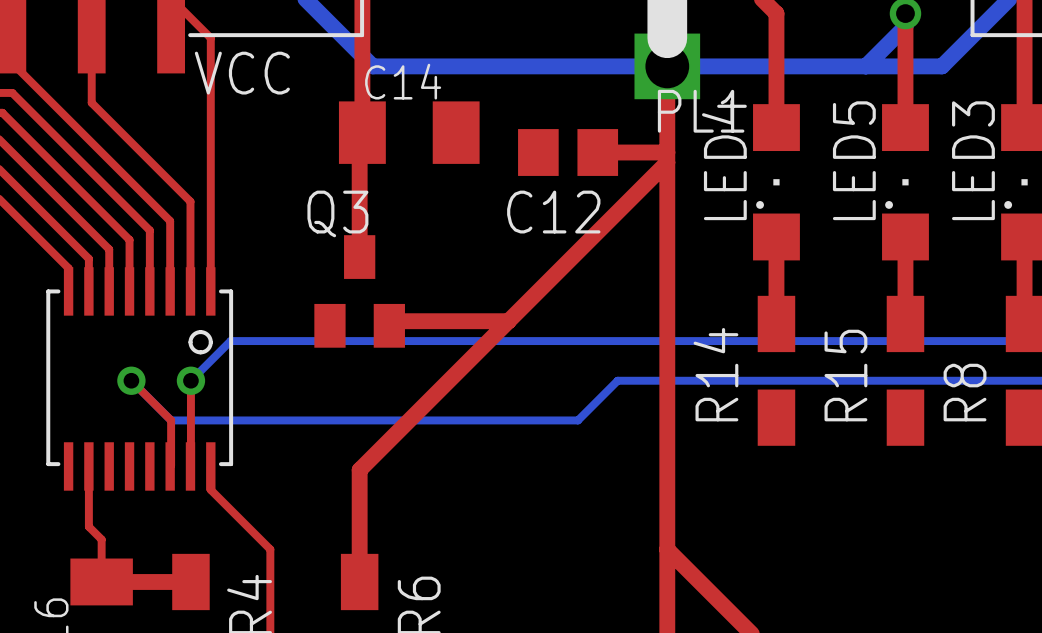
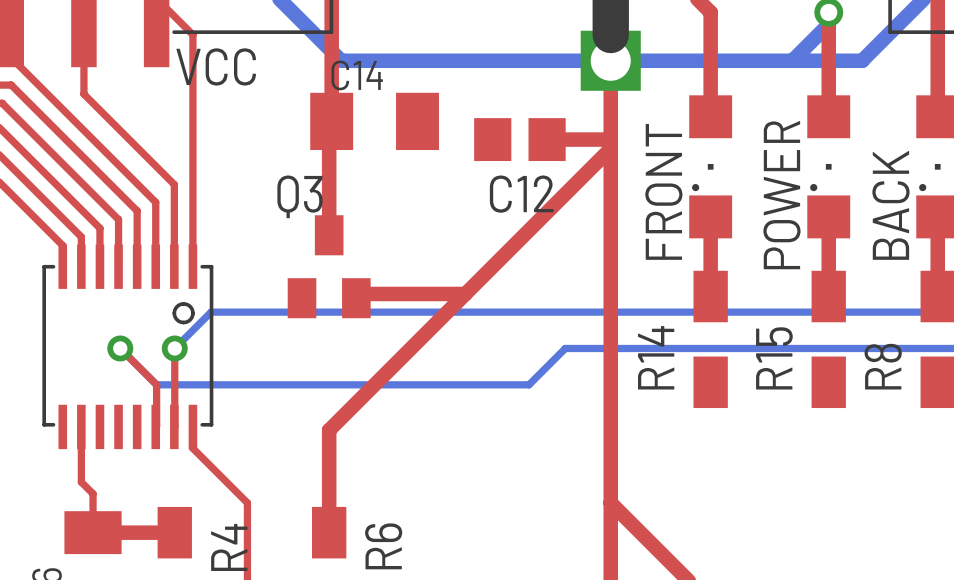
PL1 name: PL1 (701, 111) -> none
LED4 name: LED4 (724, 159) -> FRONT (663, 191)
LED5 name: LED5 (854, 160) -> POWER (781, 195)
LED3 name: LED3 (973, 160) -> BACK (890, 205)

